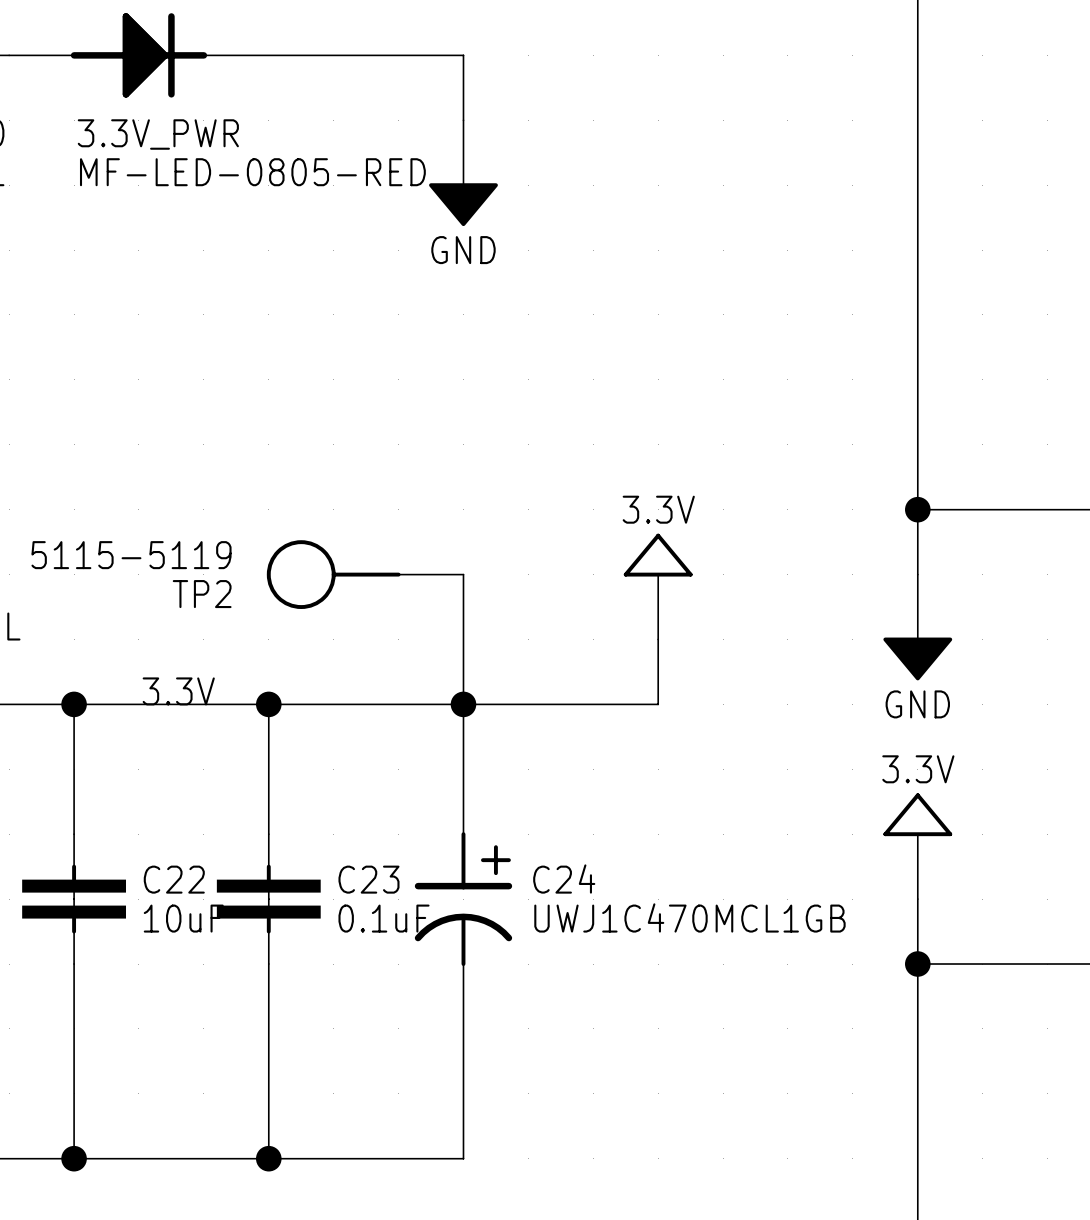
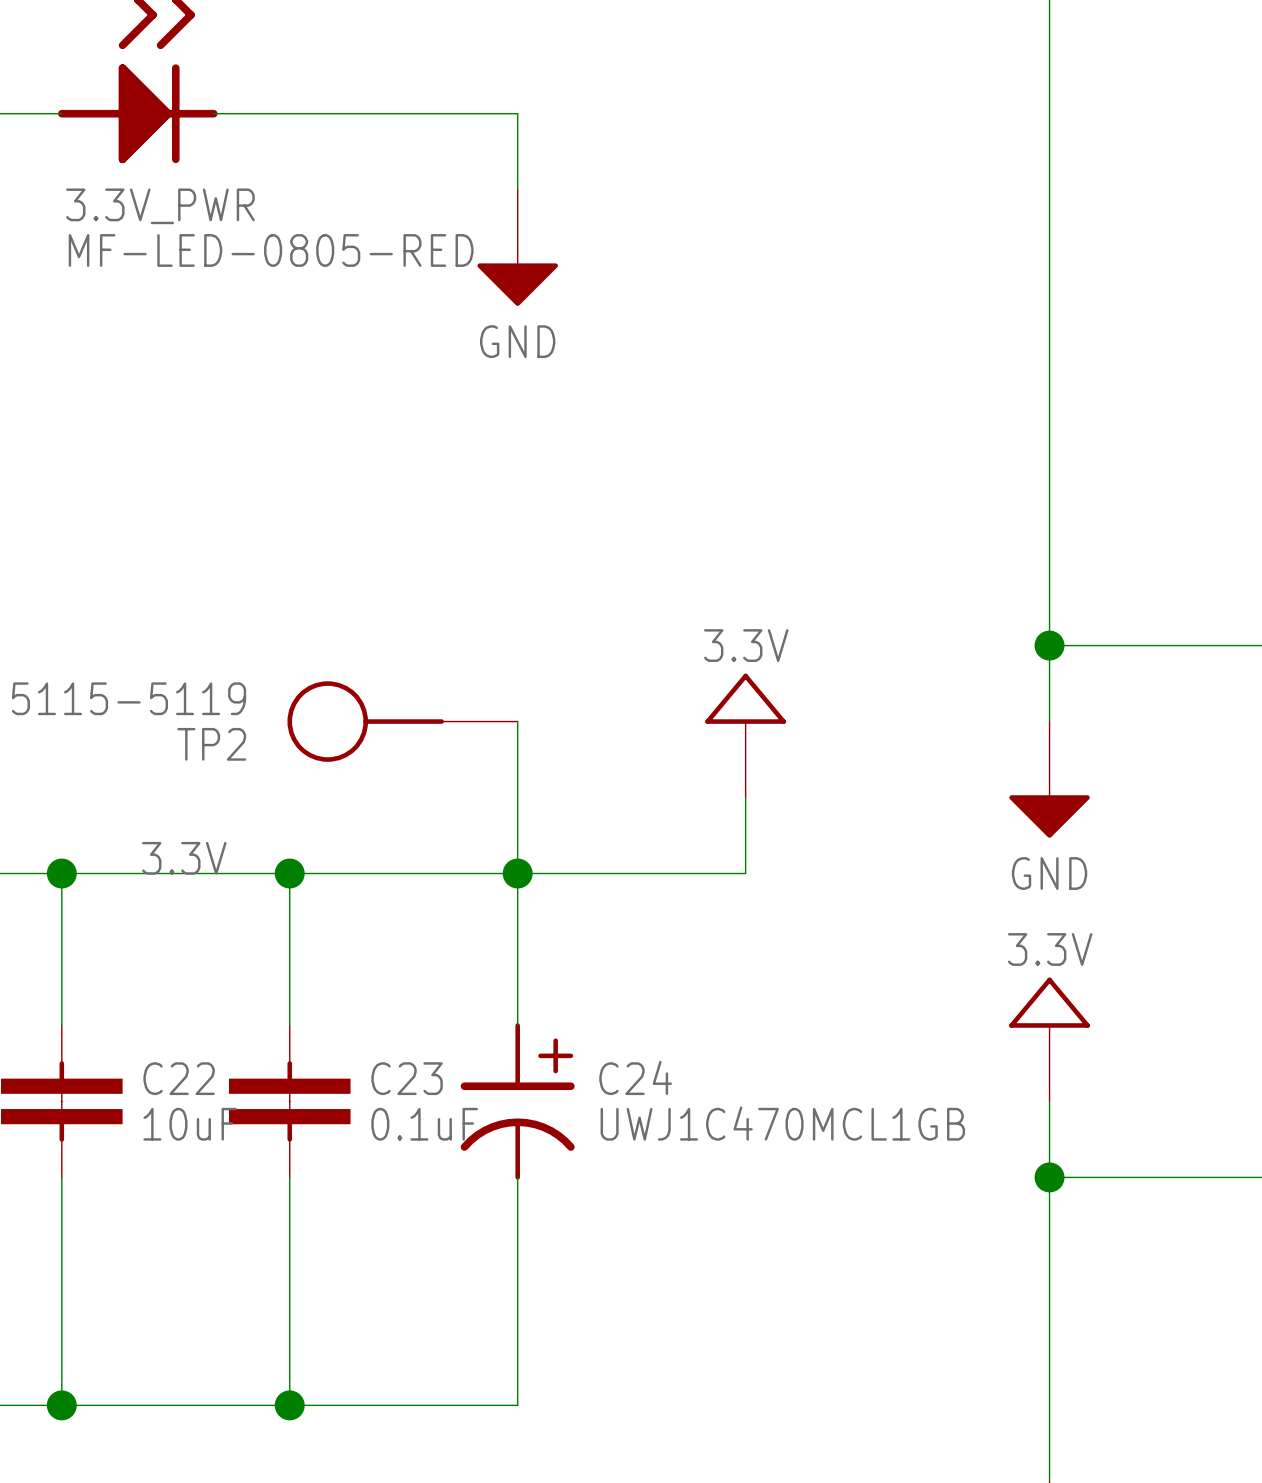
power symbol shape: [429, 120, 498, 227] -> [477, 189, 558, 306]
power symbol shape: [883, 574, 953, 681] -> [1009, 721, 1090, 838]

